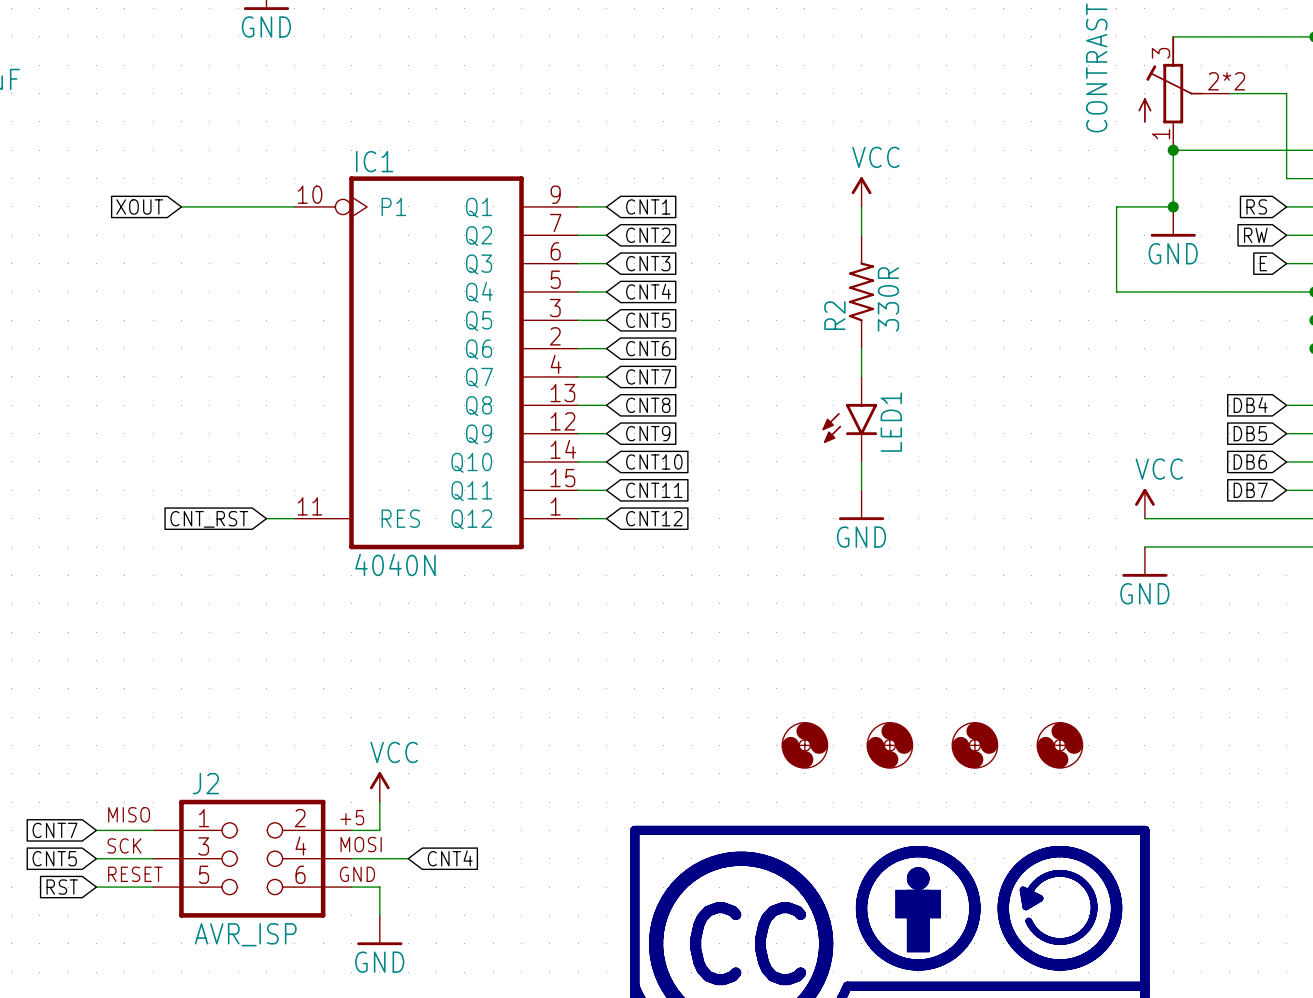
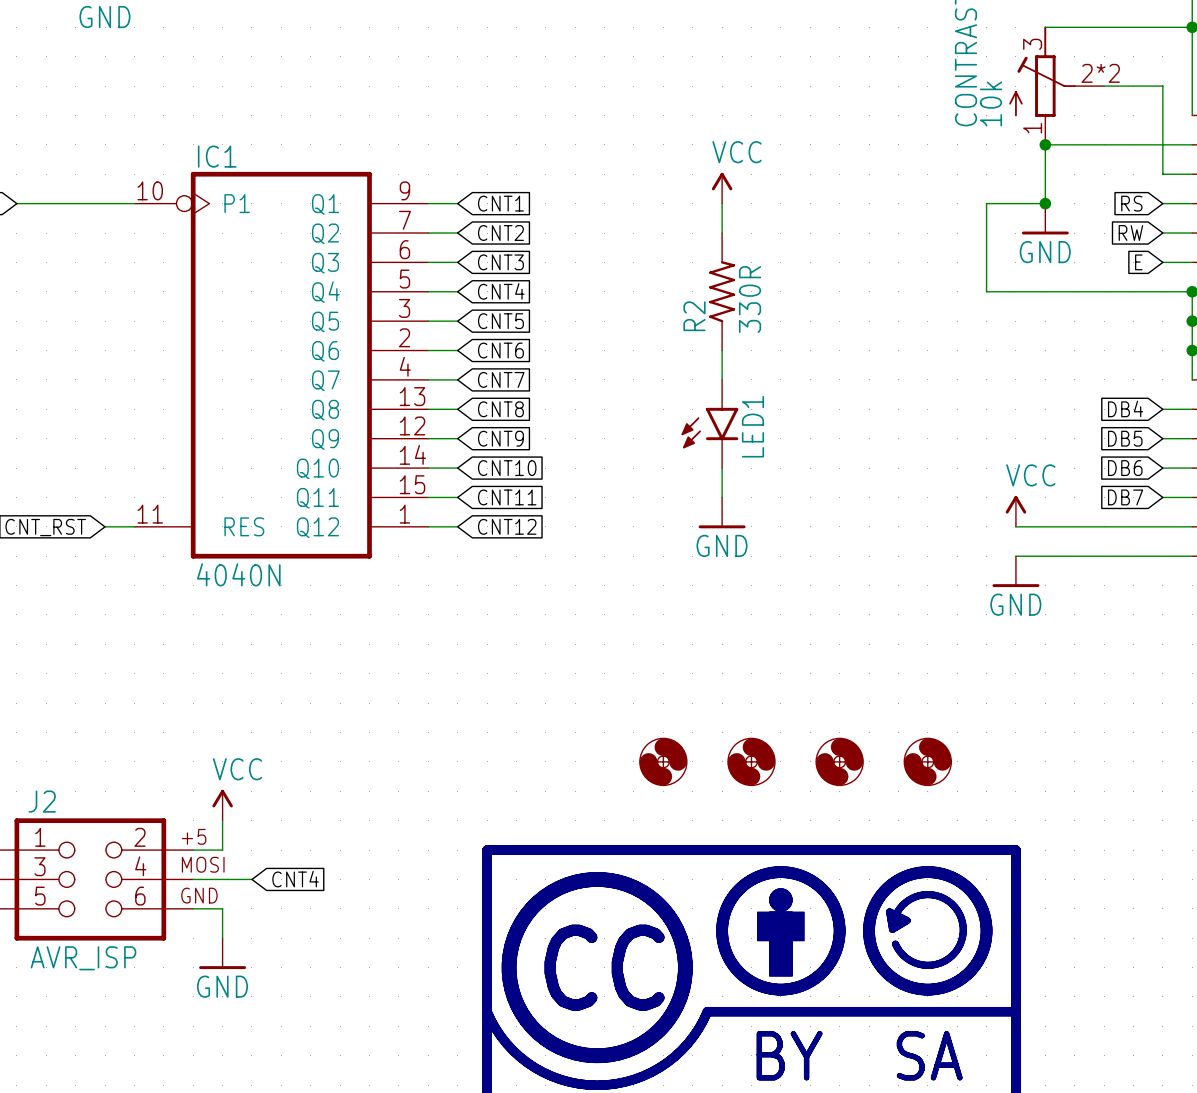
CONTRAST value: none -> 10k (990, 103)

